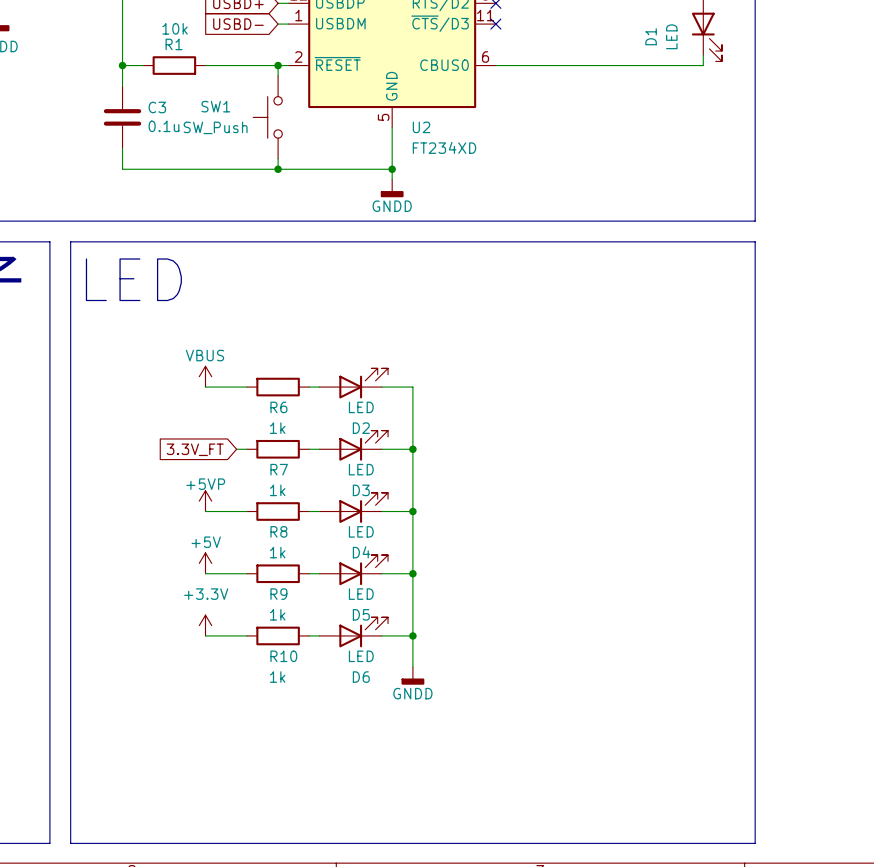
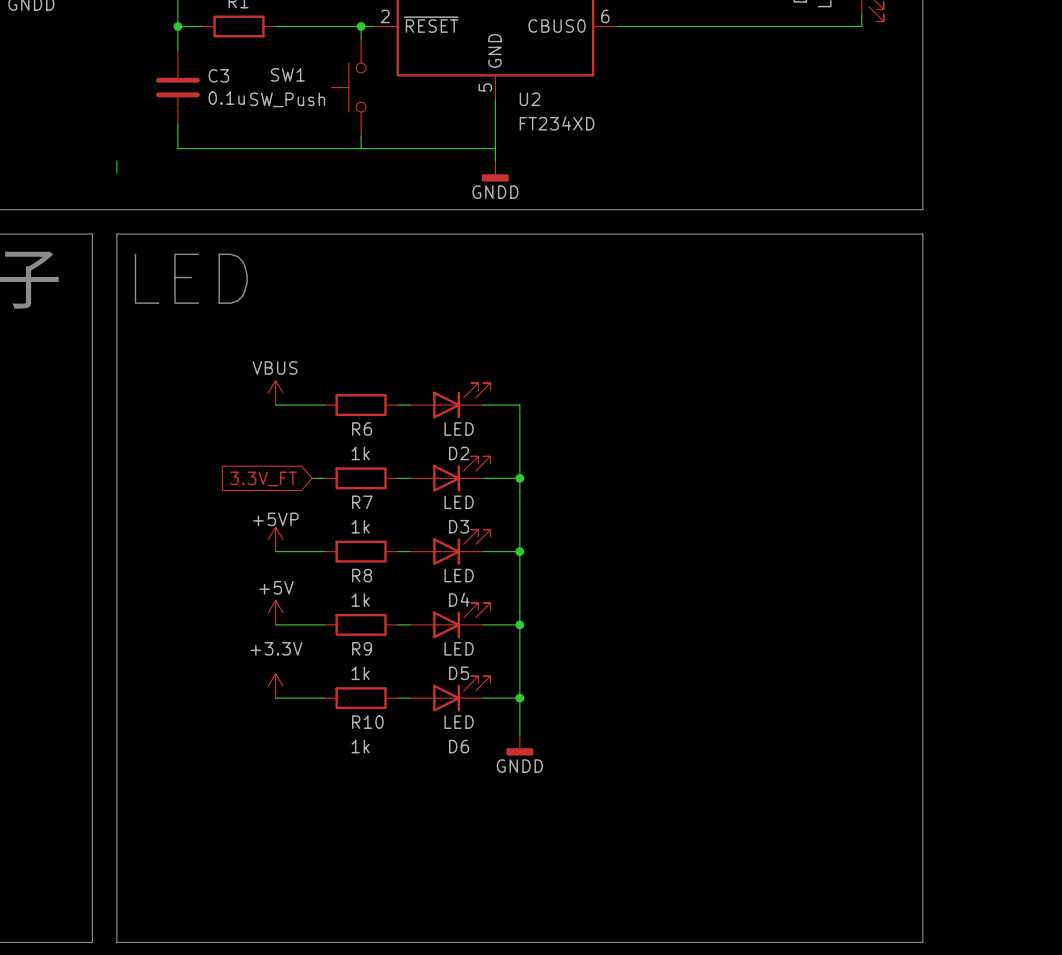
junction: (278, 169) -> none
junction: (392, 169) -> none
wire: none -> (116, 160) (116, 173)

